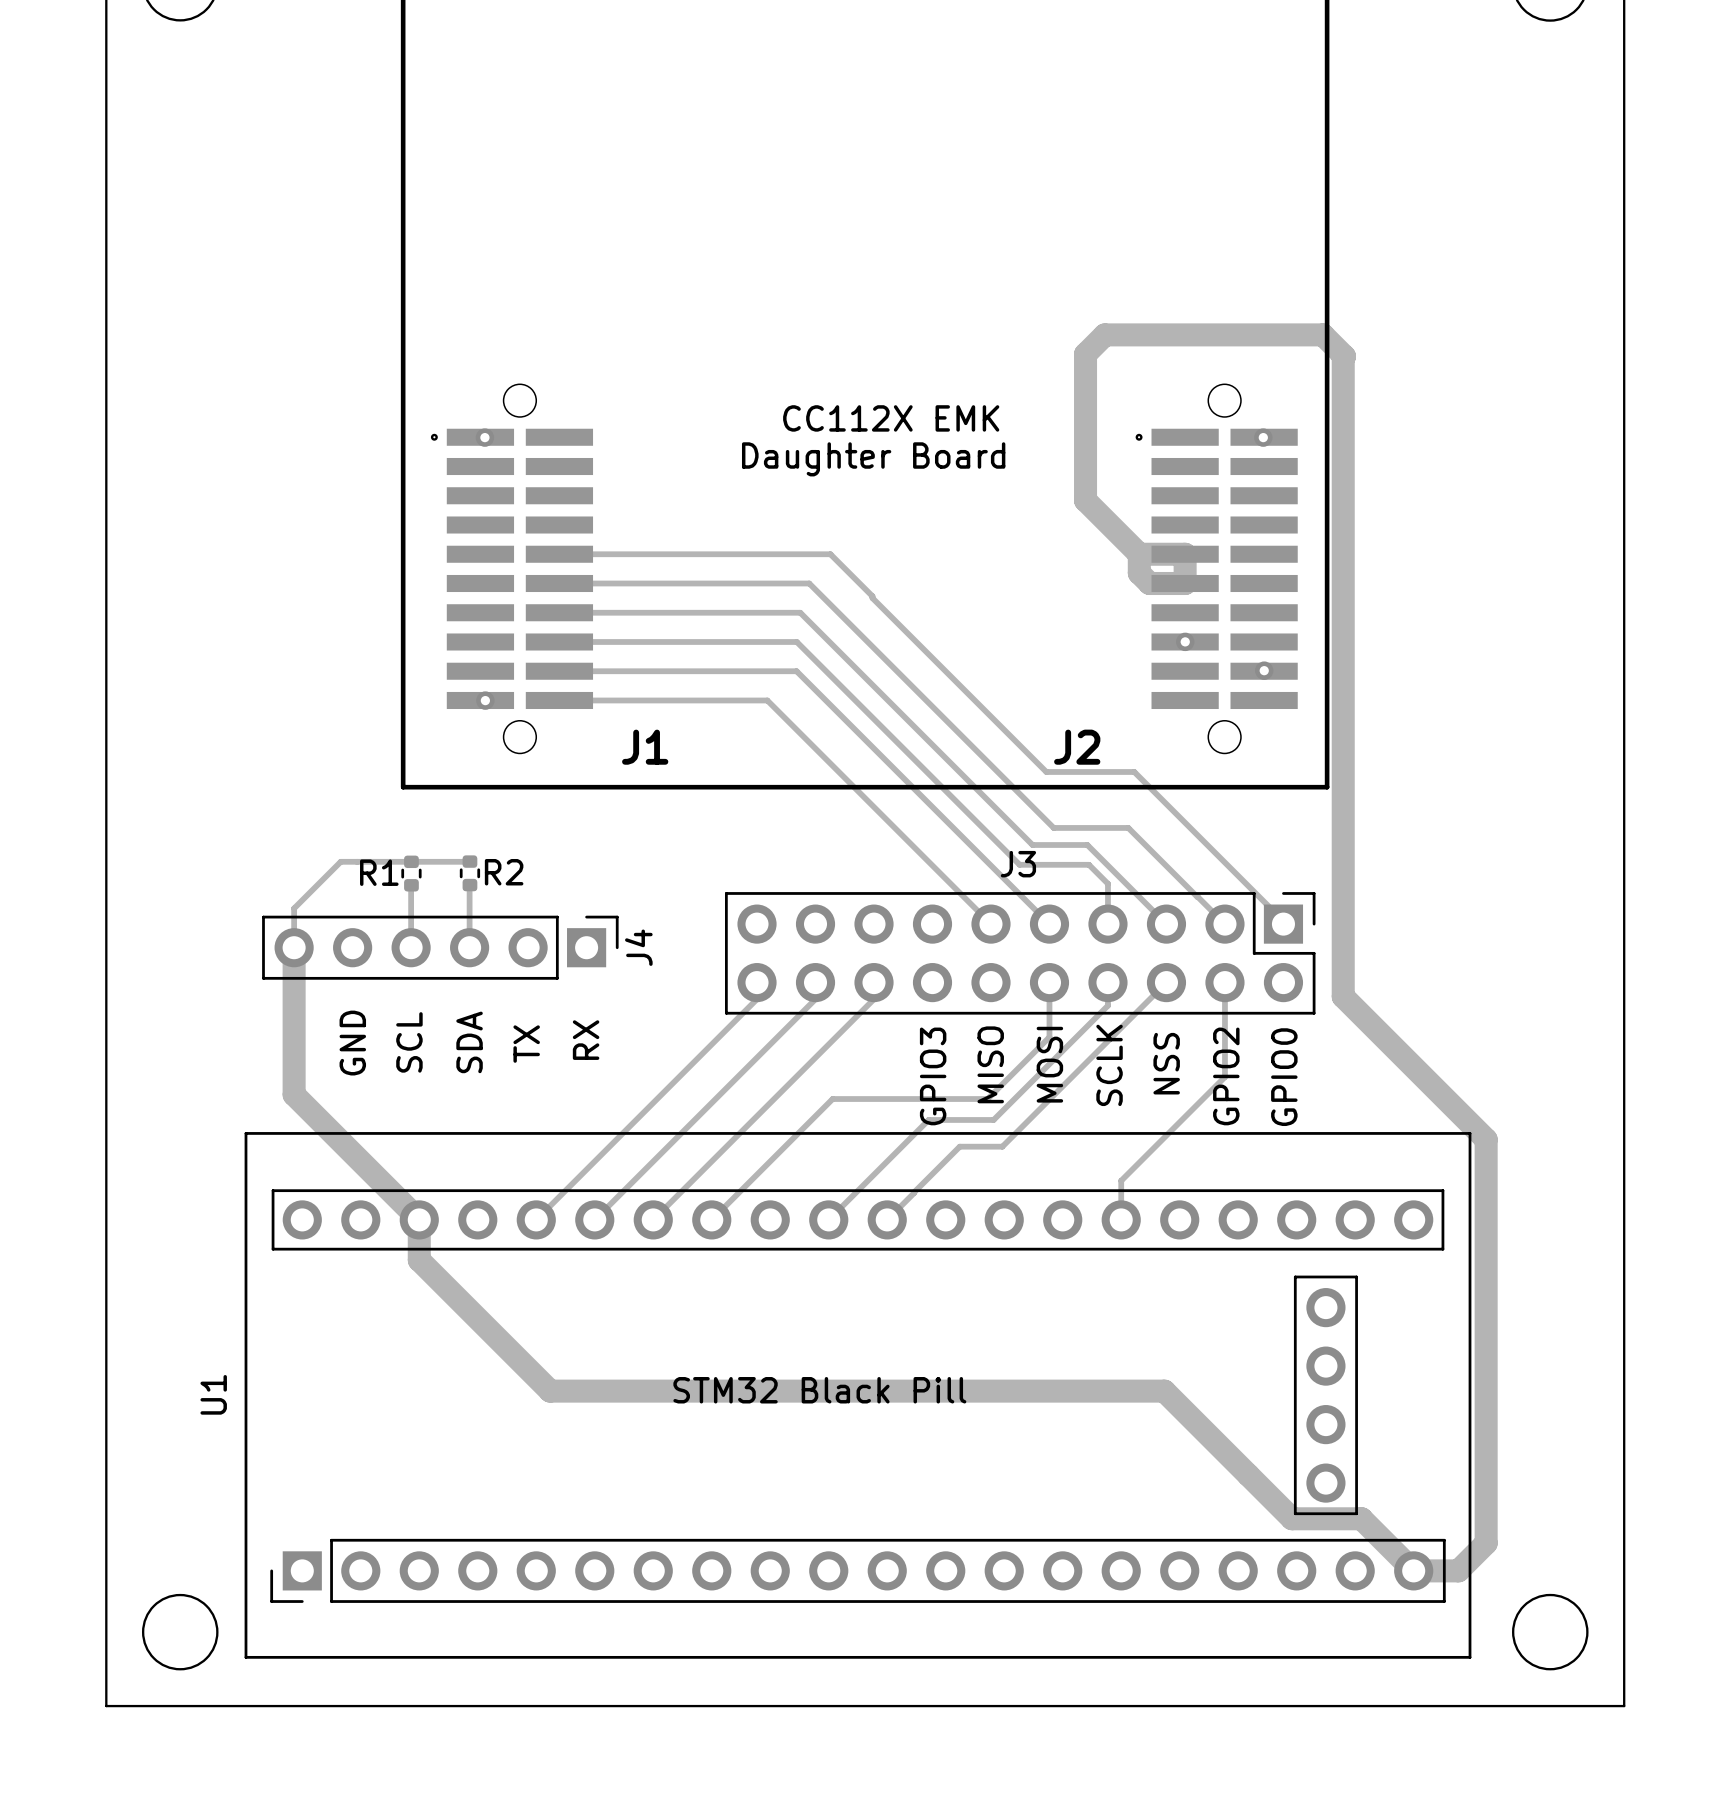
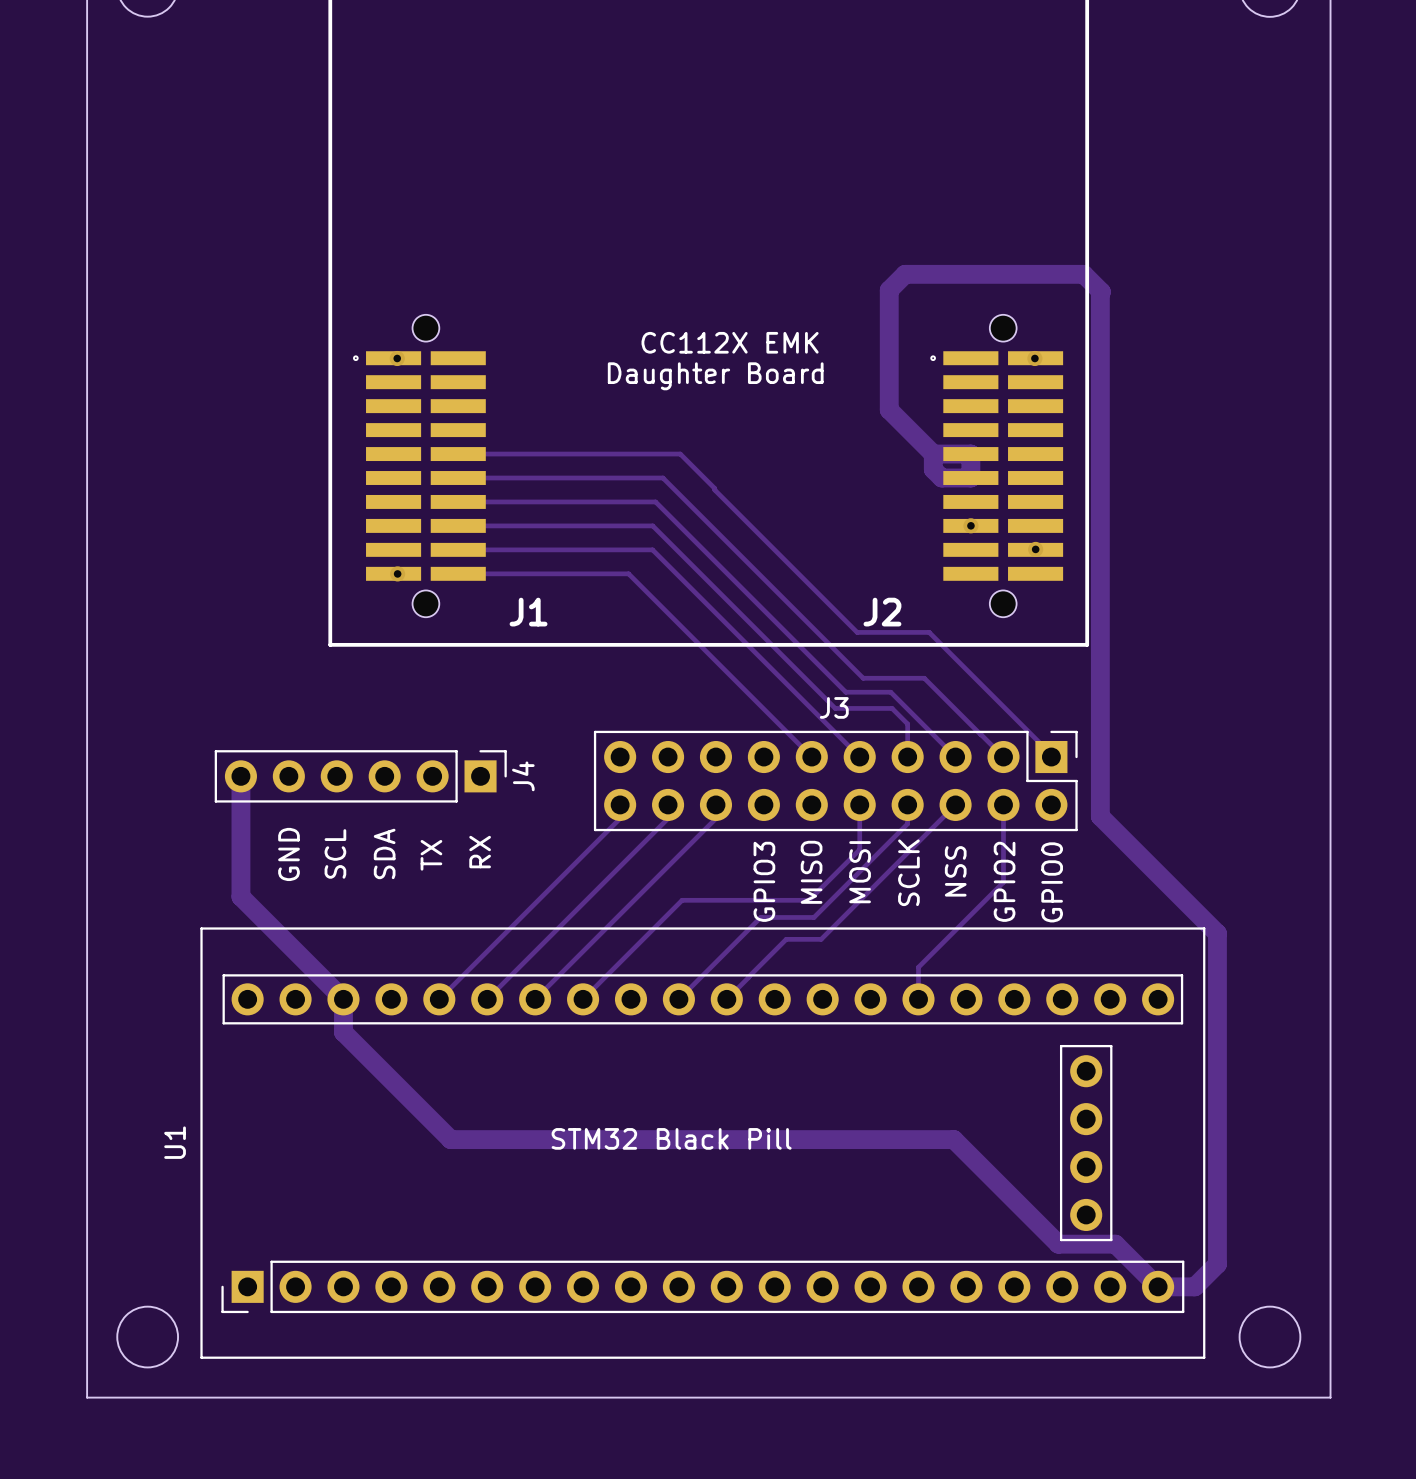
track: (469, 861) (340, 861) (294, 908) (294, 947) -> none
R1: (411, 873) -> none
R2: (469, 873) -> none
track: (411, 885) (411, 947) -> none
track: (469, 885) (469, 947) -> none

